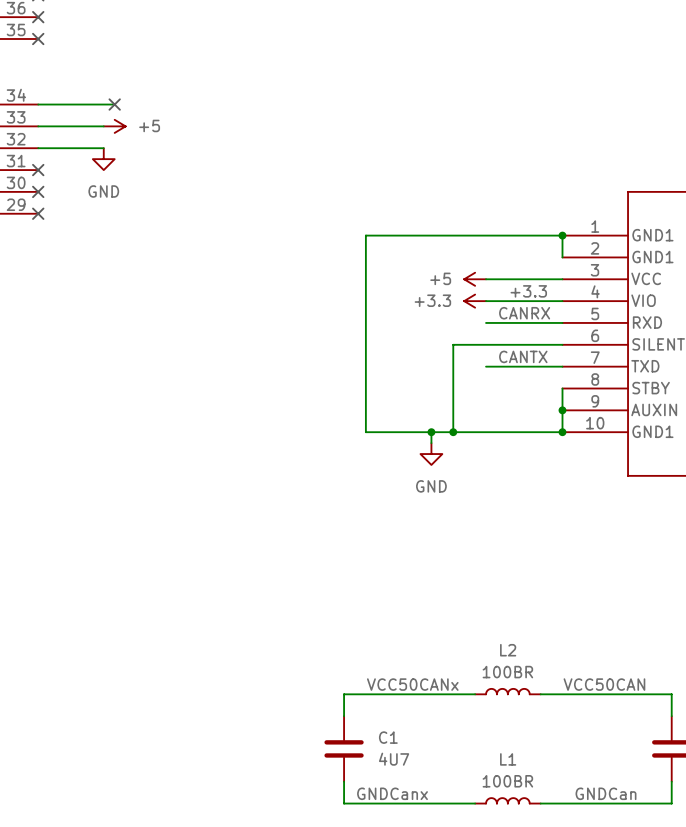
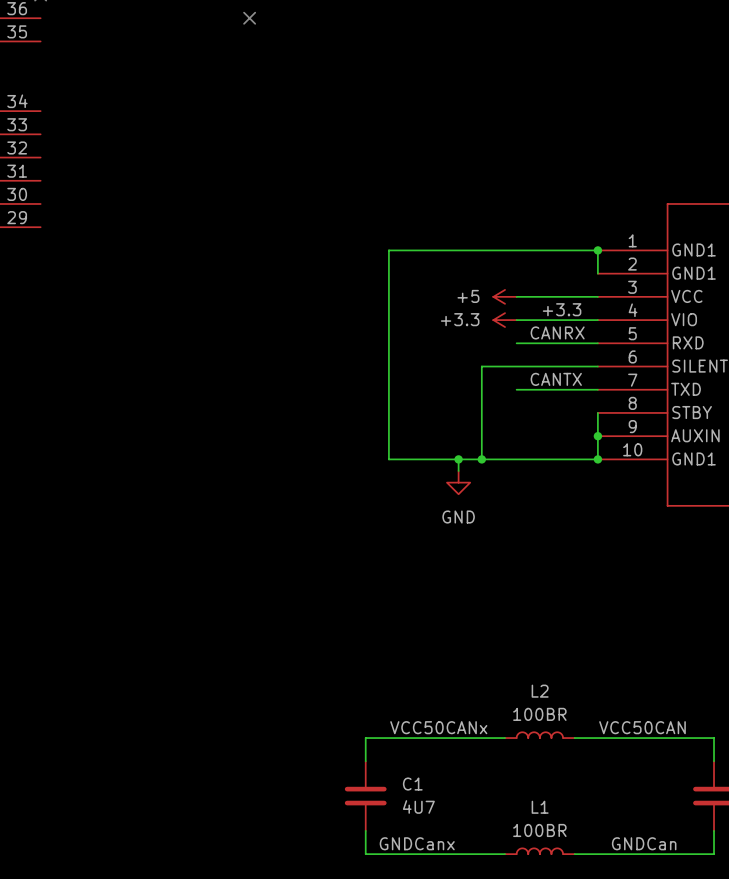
no-connect mark: (38, 17) -> none
no-connect mark: none -> (249, 18)
no-connect mark: (38, 39) -> none
wire: (38, 104) (114, 104) -> none
no-connect mark: (114, 104) -> none
wire: (38, 126) (103, 126) -> none
power symbol: +5 (114, 126) -> none
wire: (38, 148) (103, 148) -> none
power symbol: GND (103, 159) -> none
no-connect mark: (38, 170) -> none
no-connect mark: (38, 191) -> none
no-connect mark: (38, 213) -> none

